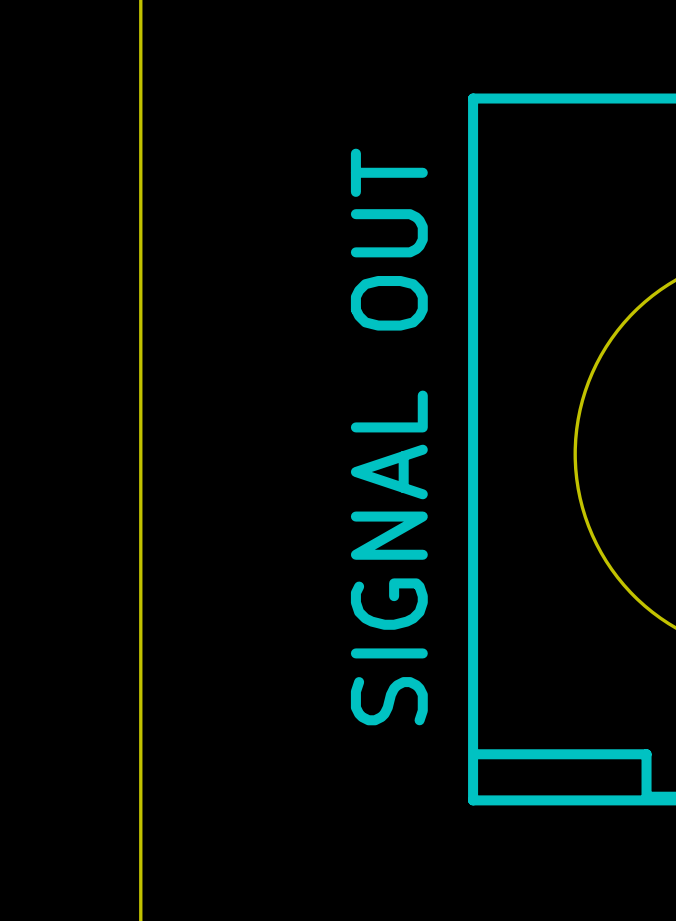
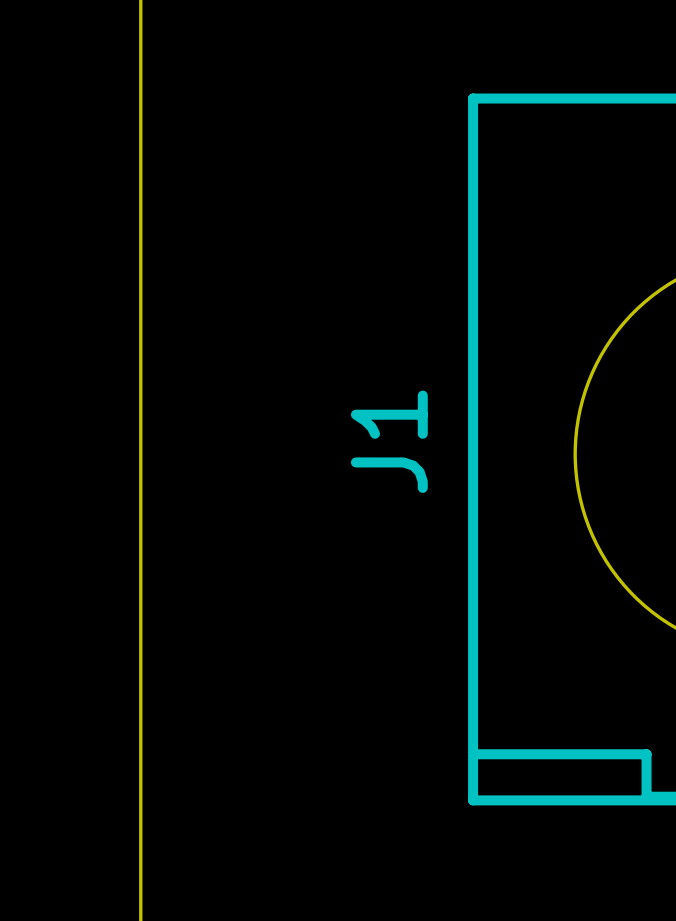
SIGNAL OUT name: SIGNAL OUT (389, 436) -> J1 (389, 441)

